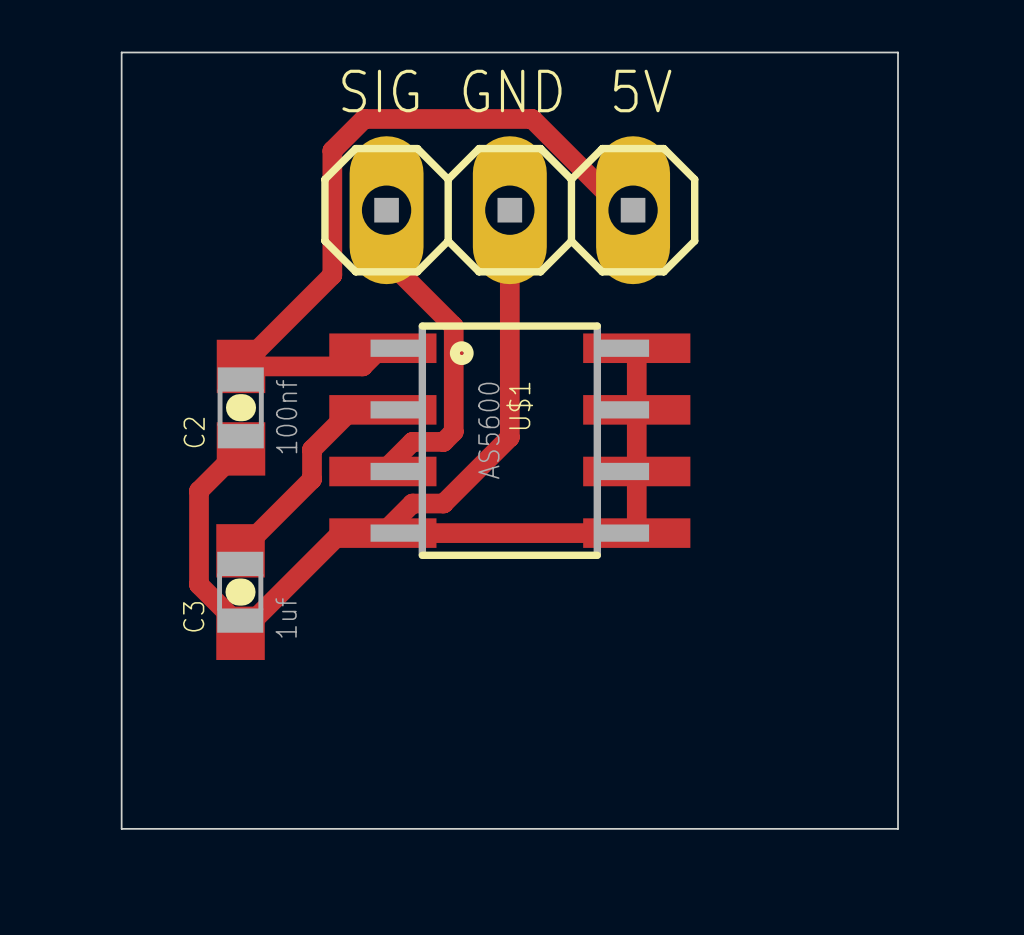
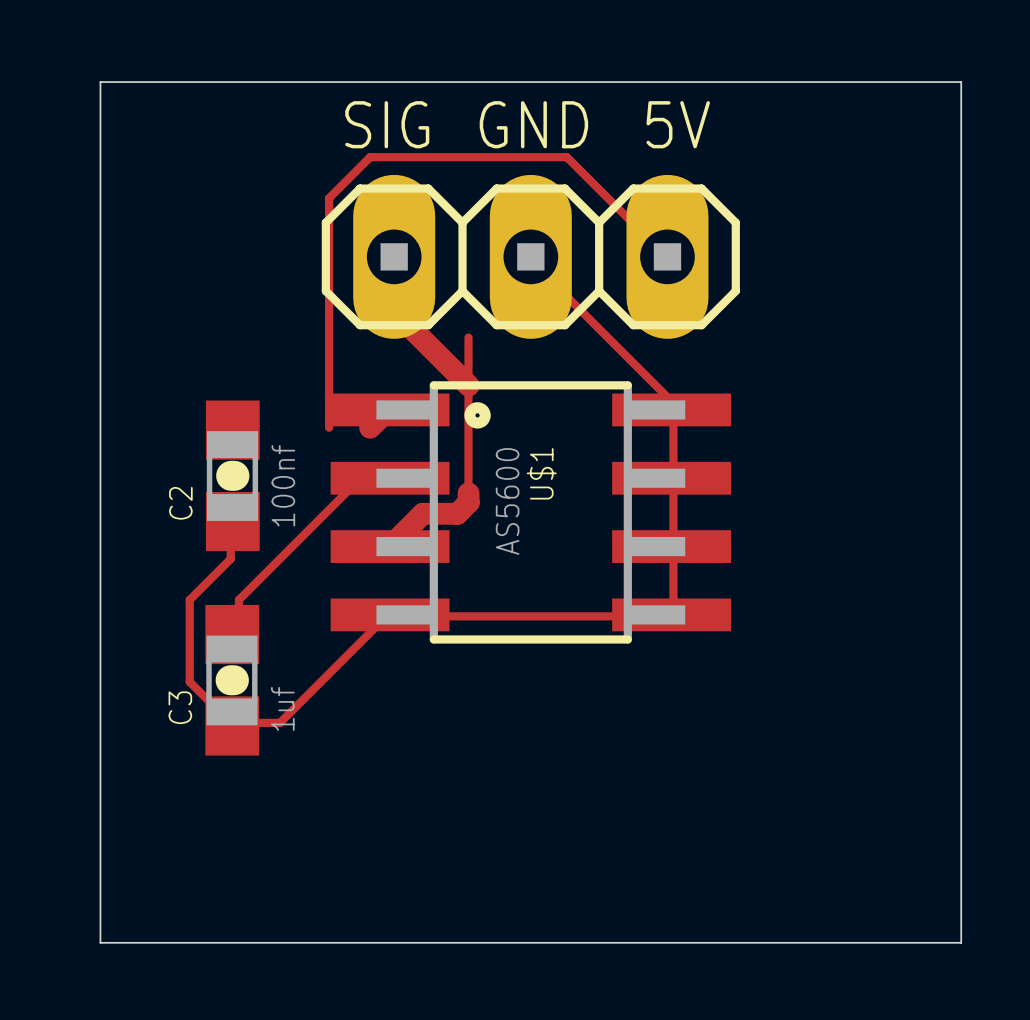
track: (509, 210) (509, 437) (443, 503) (412, 503) (382, 533) -> (530, 256) (534, 263) (673, 403) (671, 409) (673, 411) (673, 476) (671, 478) (673, 485) (673, 542) (671, 546) (673, 550) (673, 608) (671, 614) (390, 614) (279, 722) (238, 722) (232, 725) (189, 681) (189, 599) (230, 558) (230, 526) (232, 521)
track: (633, 210) (623, 210) (532, 118) (364, 118) (332, 150) (332, 275) (241, 366) (362, 366) (364, 364) -> (667, 256) (566, 157) (370, 157) (329, 198) (329, 427)
track width: thick (453, 326) (453, 431) -> thin (468, 385) (468, 502)
track: (636, 348) (636, 533) (340, 533) (240, 633) (240, 626) (199, 584) (199, 490) (241, 448) -> none
track: (382, 409) (351, 409) (312, 449) (312, 479) (240, 550) -> none
track: none -> (353, 485) (238, 599) (238, 632)

